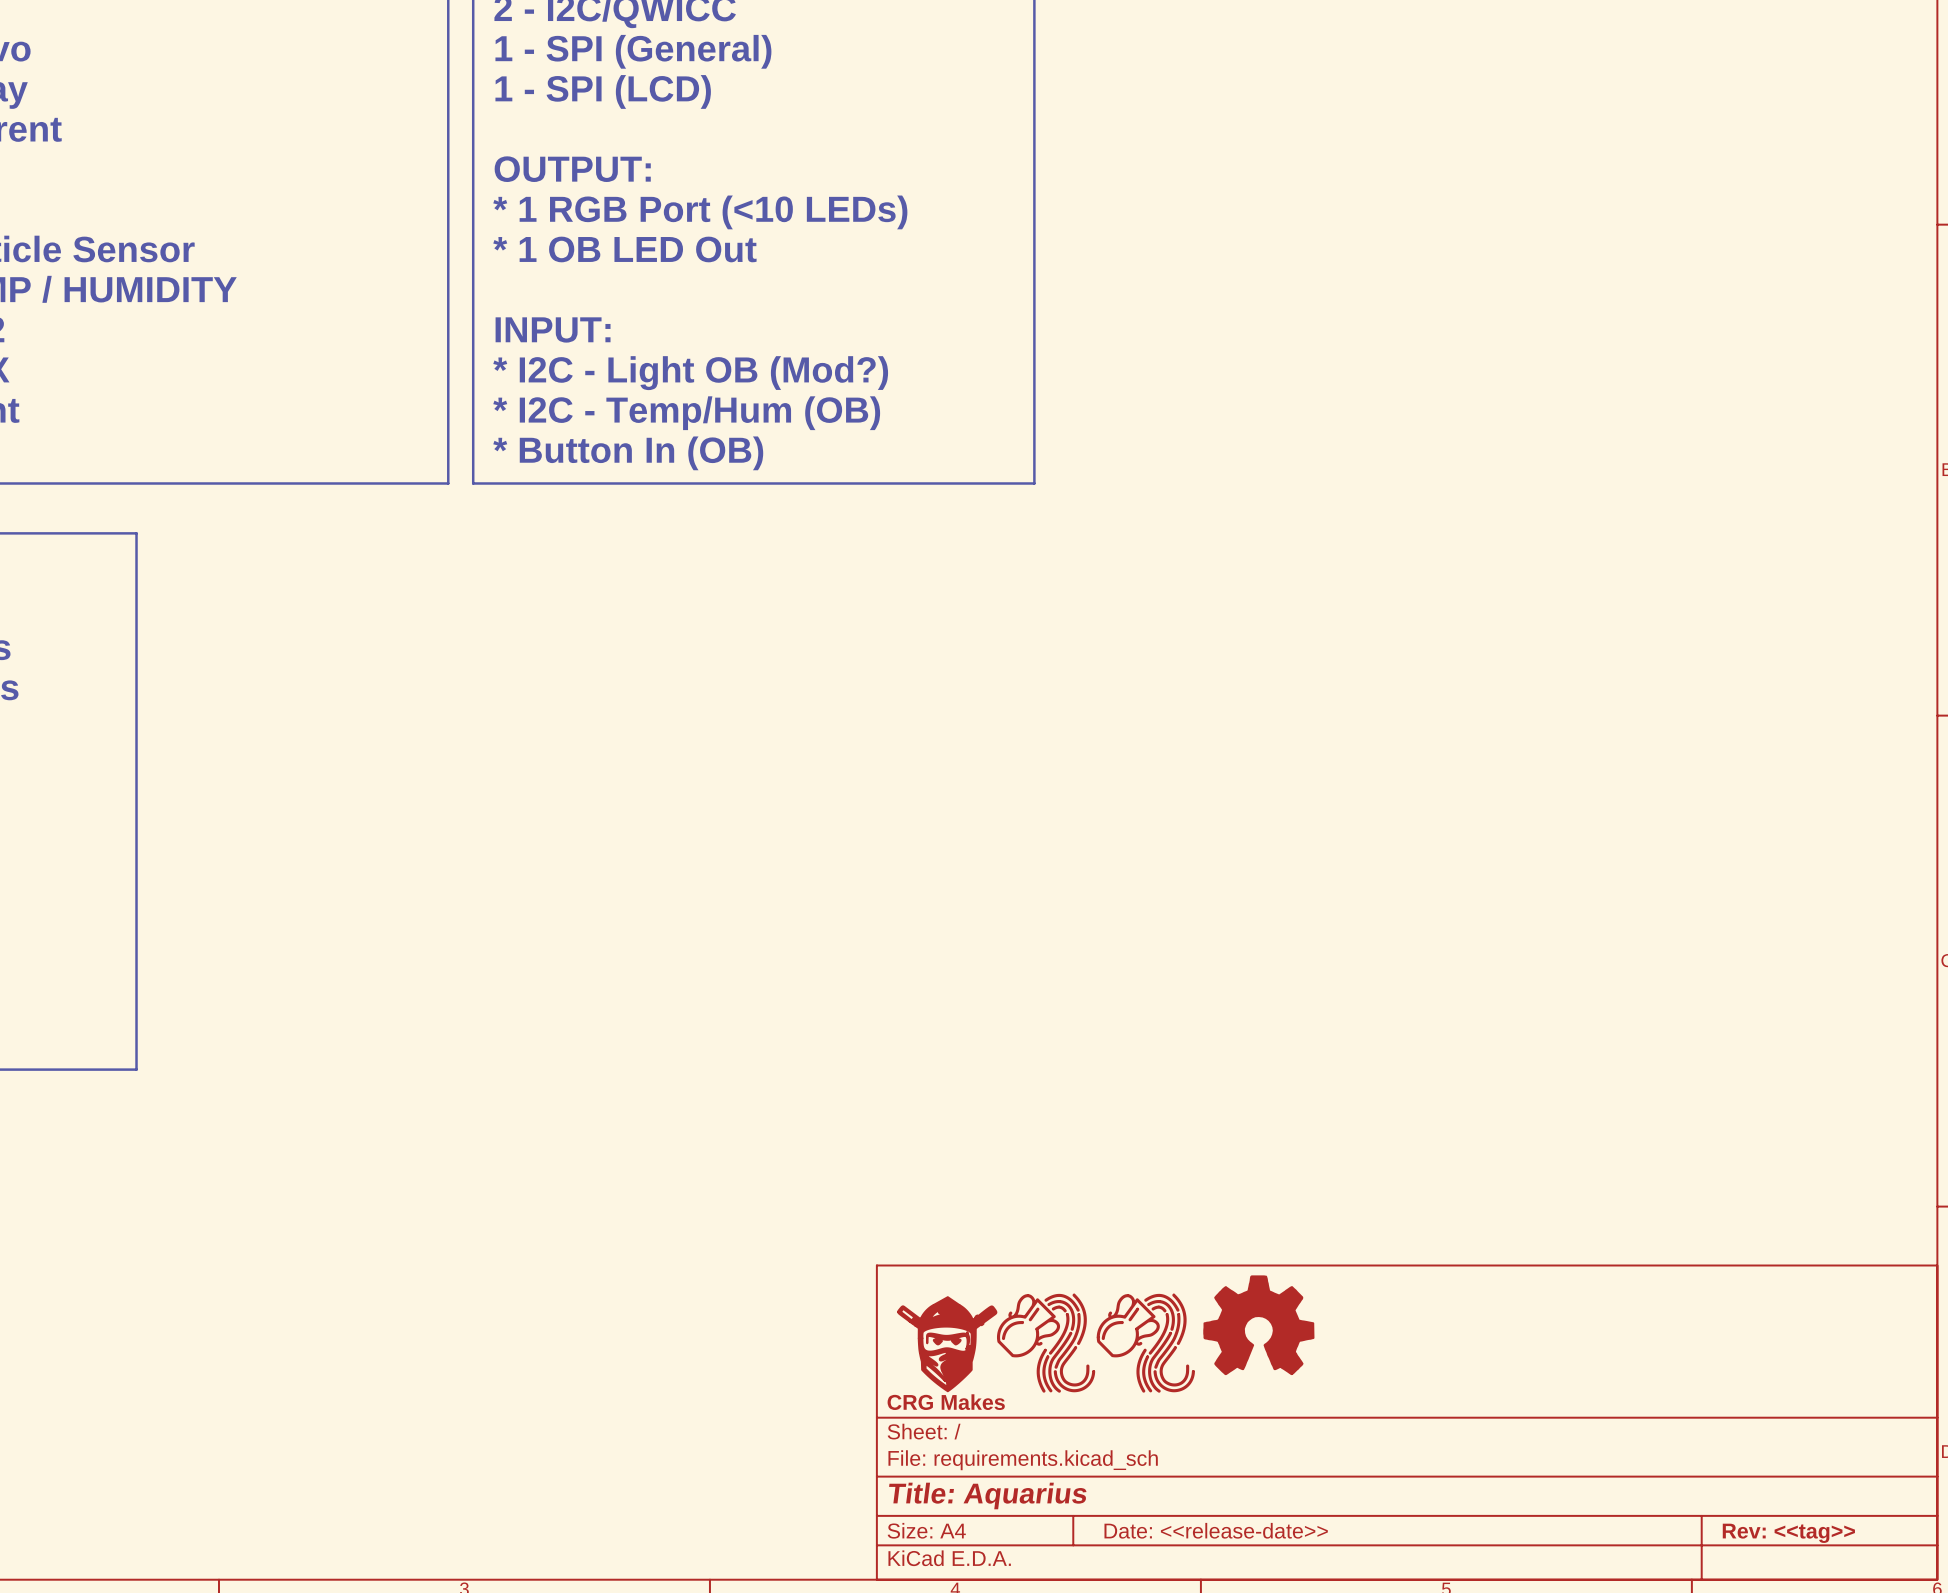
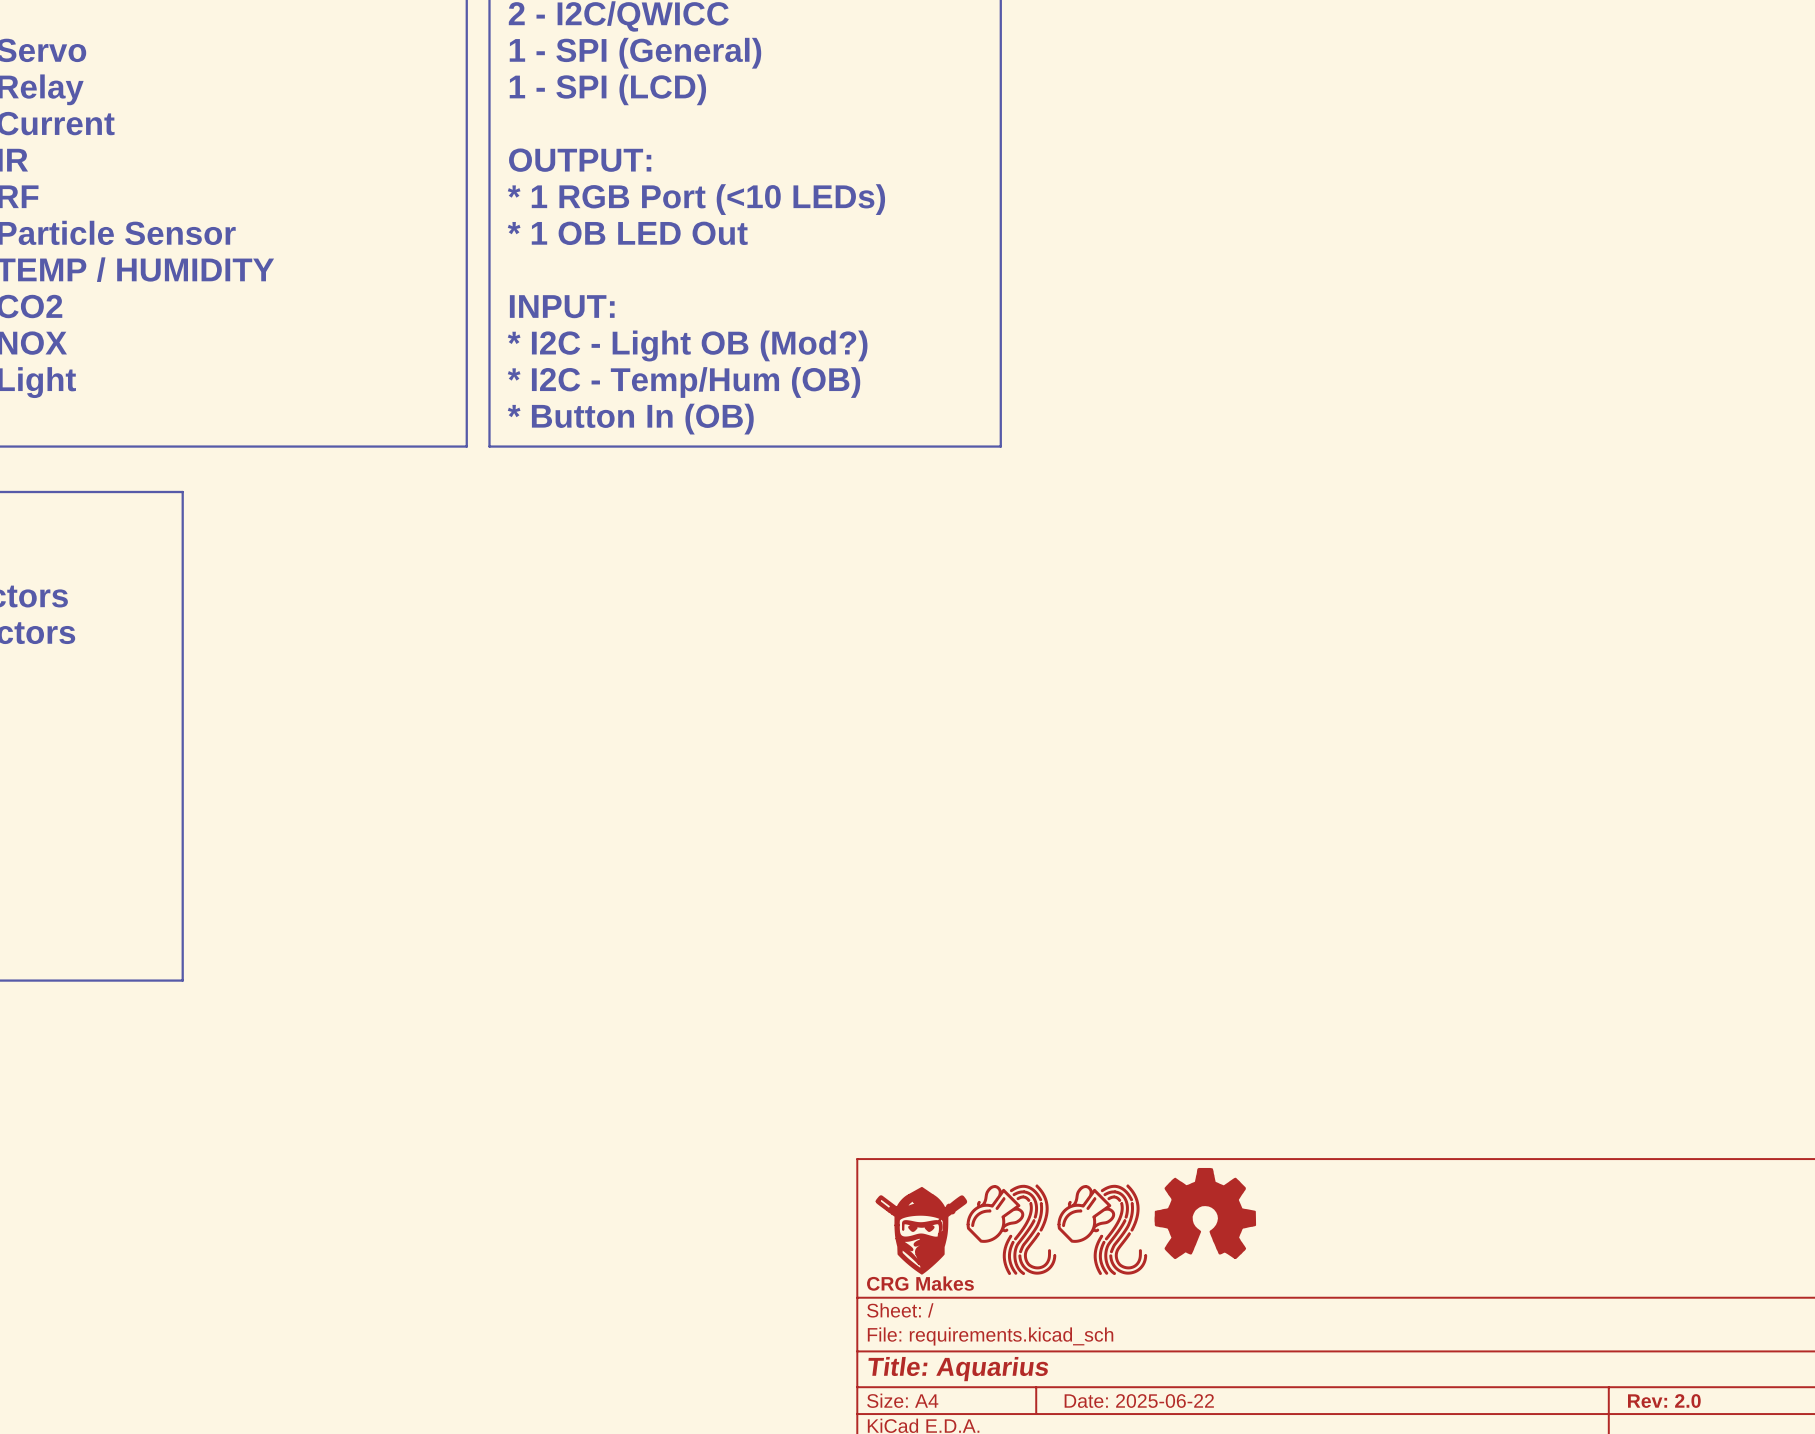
title block: Date: <<release-date>> (1216, 1530) -> Date: 2025-06-22 (1139, 1401)
title block: Rev: <<tag>> (1788, 1533) -> Rev: 2.0 (1664, 1401)

